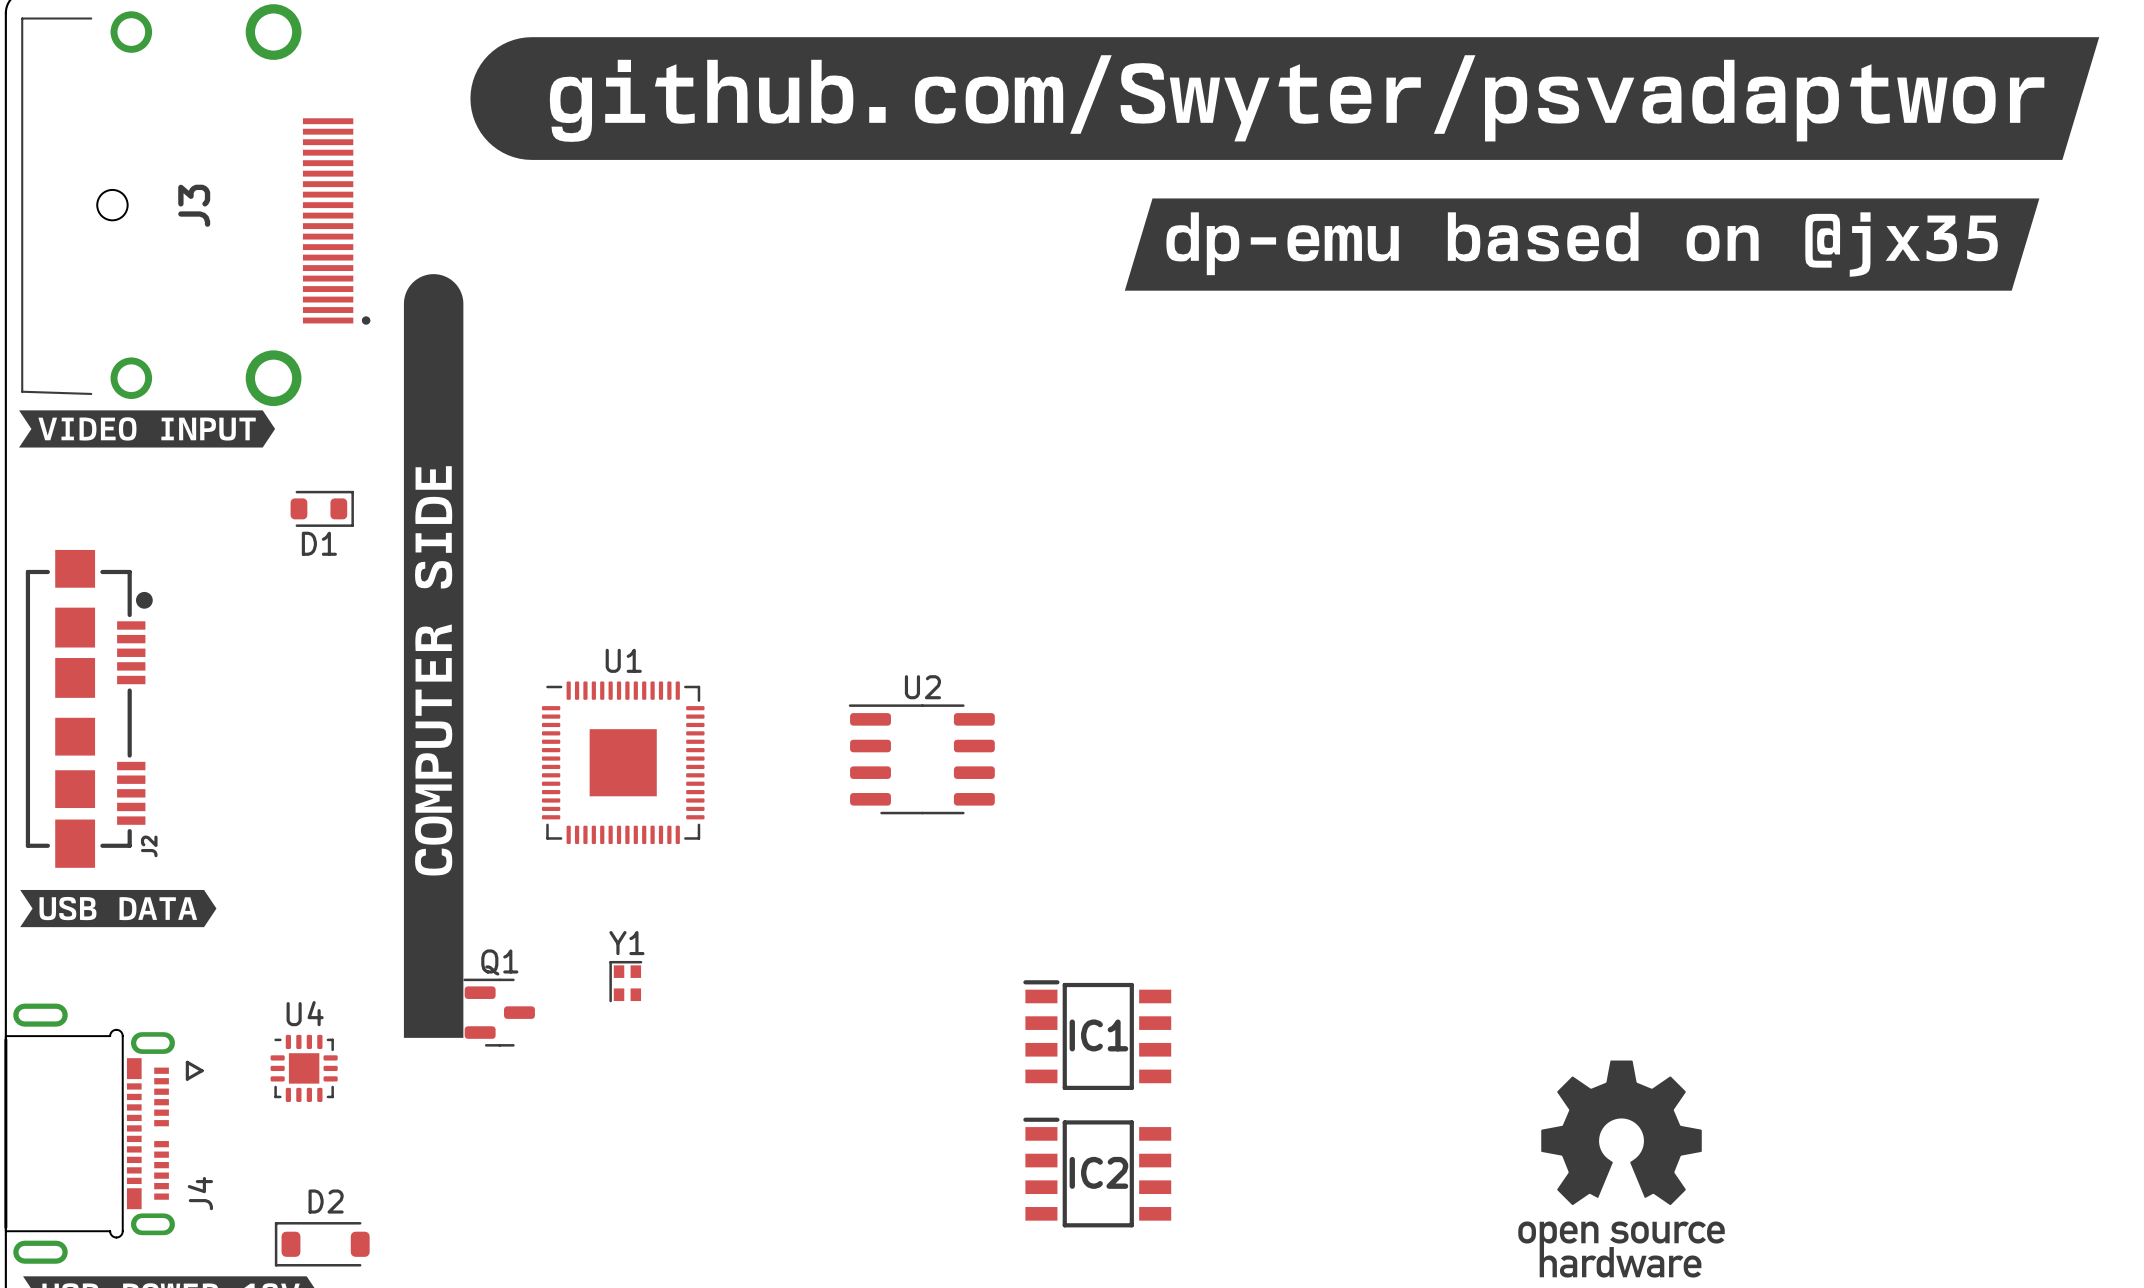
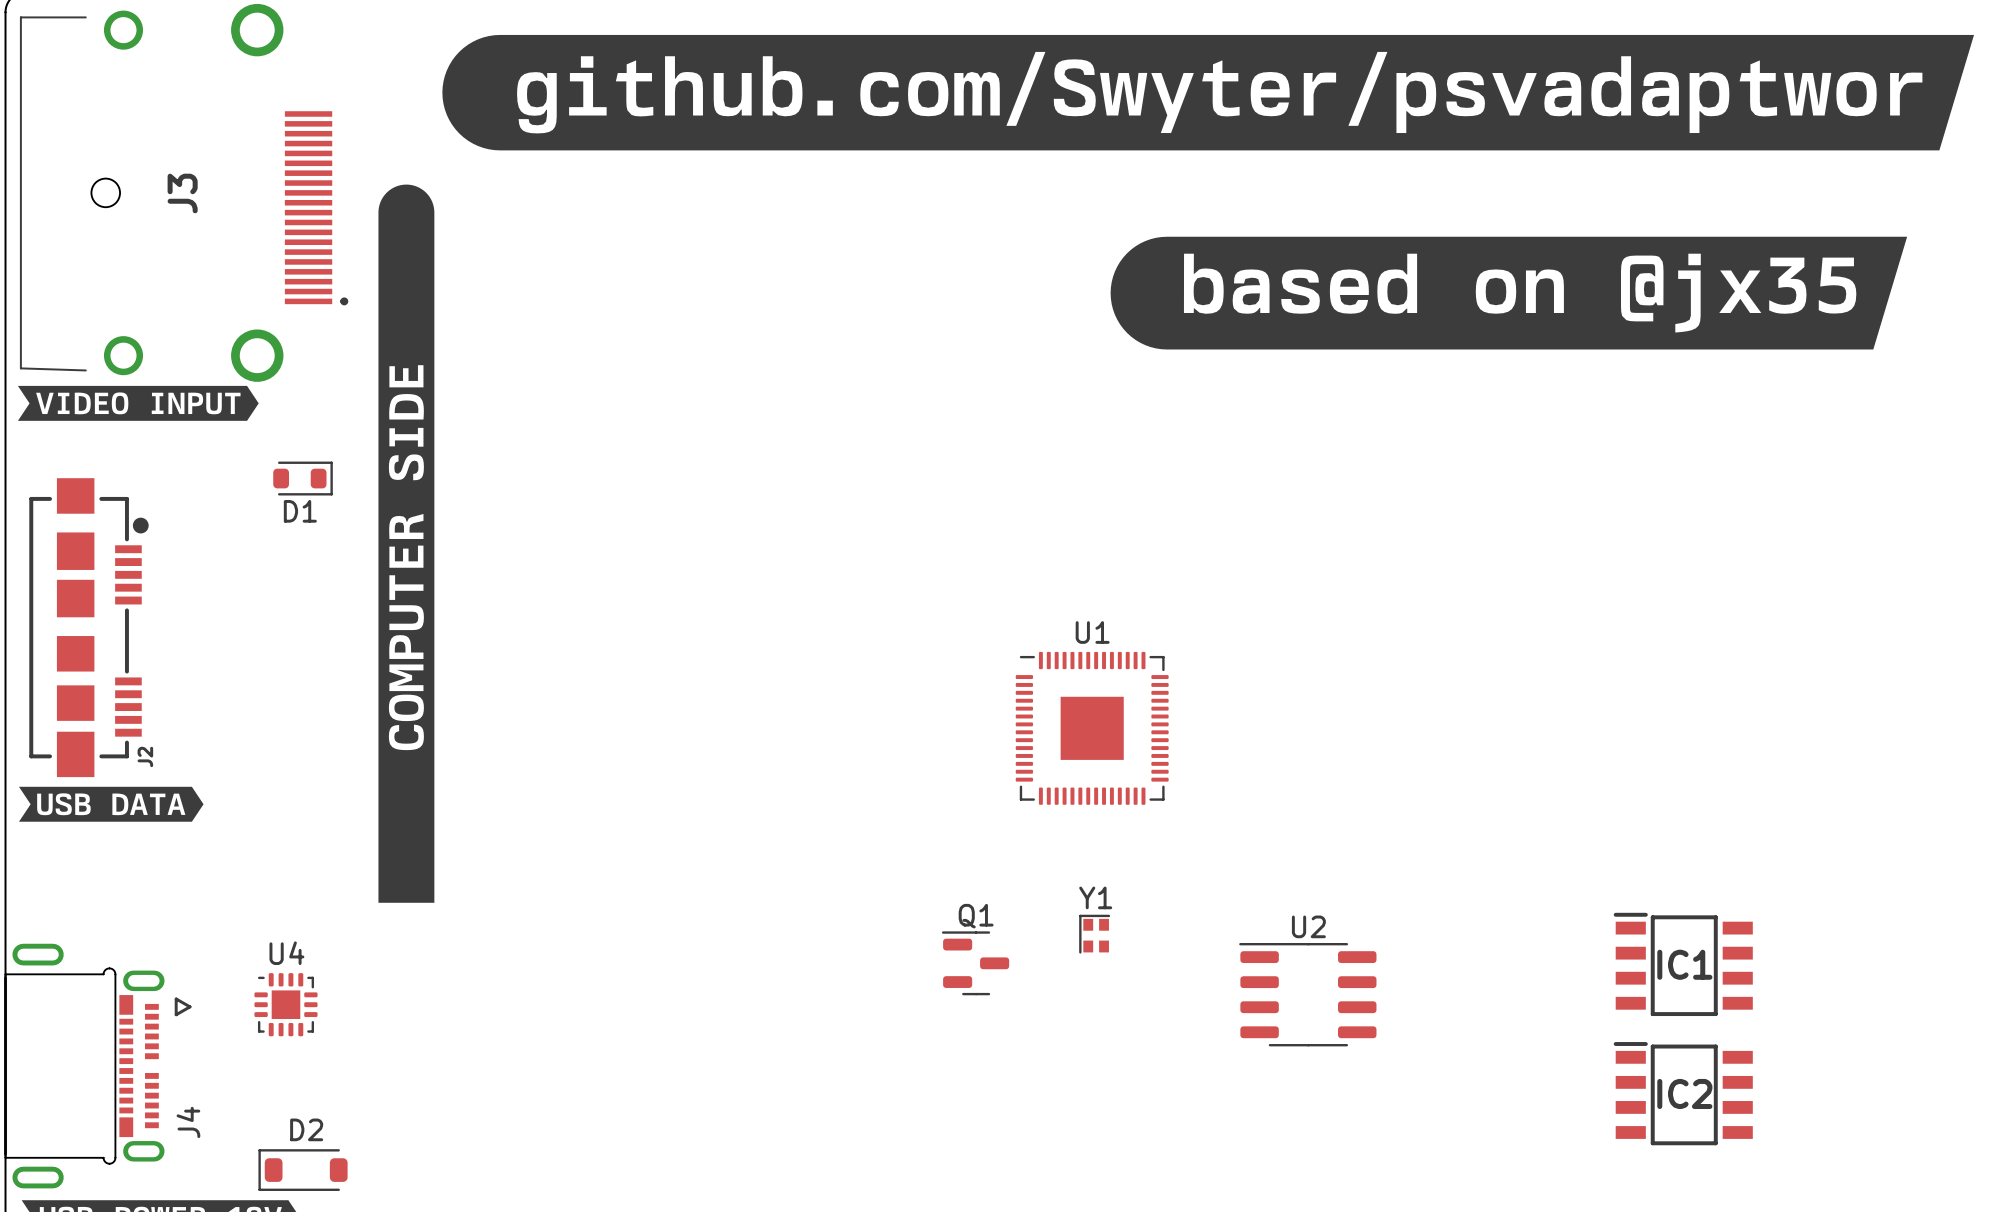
drawing: [1124, 198, 2040, 291] -> none
drawing: none -> [1110, 236, 1908, 350]
drawing position: (433, 655) -> (406, 543)
J2 position: (89, 708) -> (88, 627)
U2 position: (921, 759) -> (1307, 994)
U1 position: (623, 762) -> (1092, 728)
drawing position: (118, 908) -> (111, 804)
Y1 position: (625, 981) -> (1094, 934)
Q1 position: (499, 1012) -> (975, 963)
IC1 position: (1097, 1035) -> (1683, 964)
drawing: [1518, 1060, 1725, 1278] -> none
IC2 position: (1097, 1172) -> (1683, 1093)

